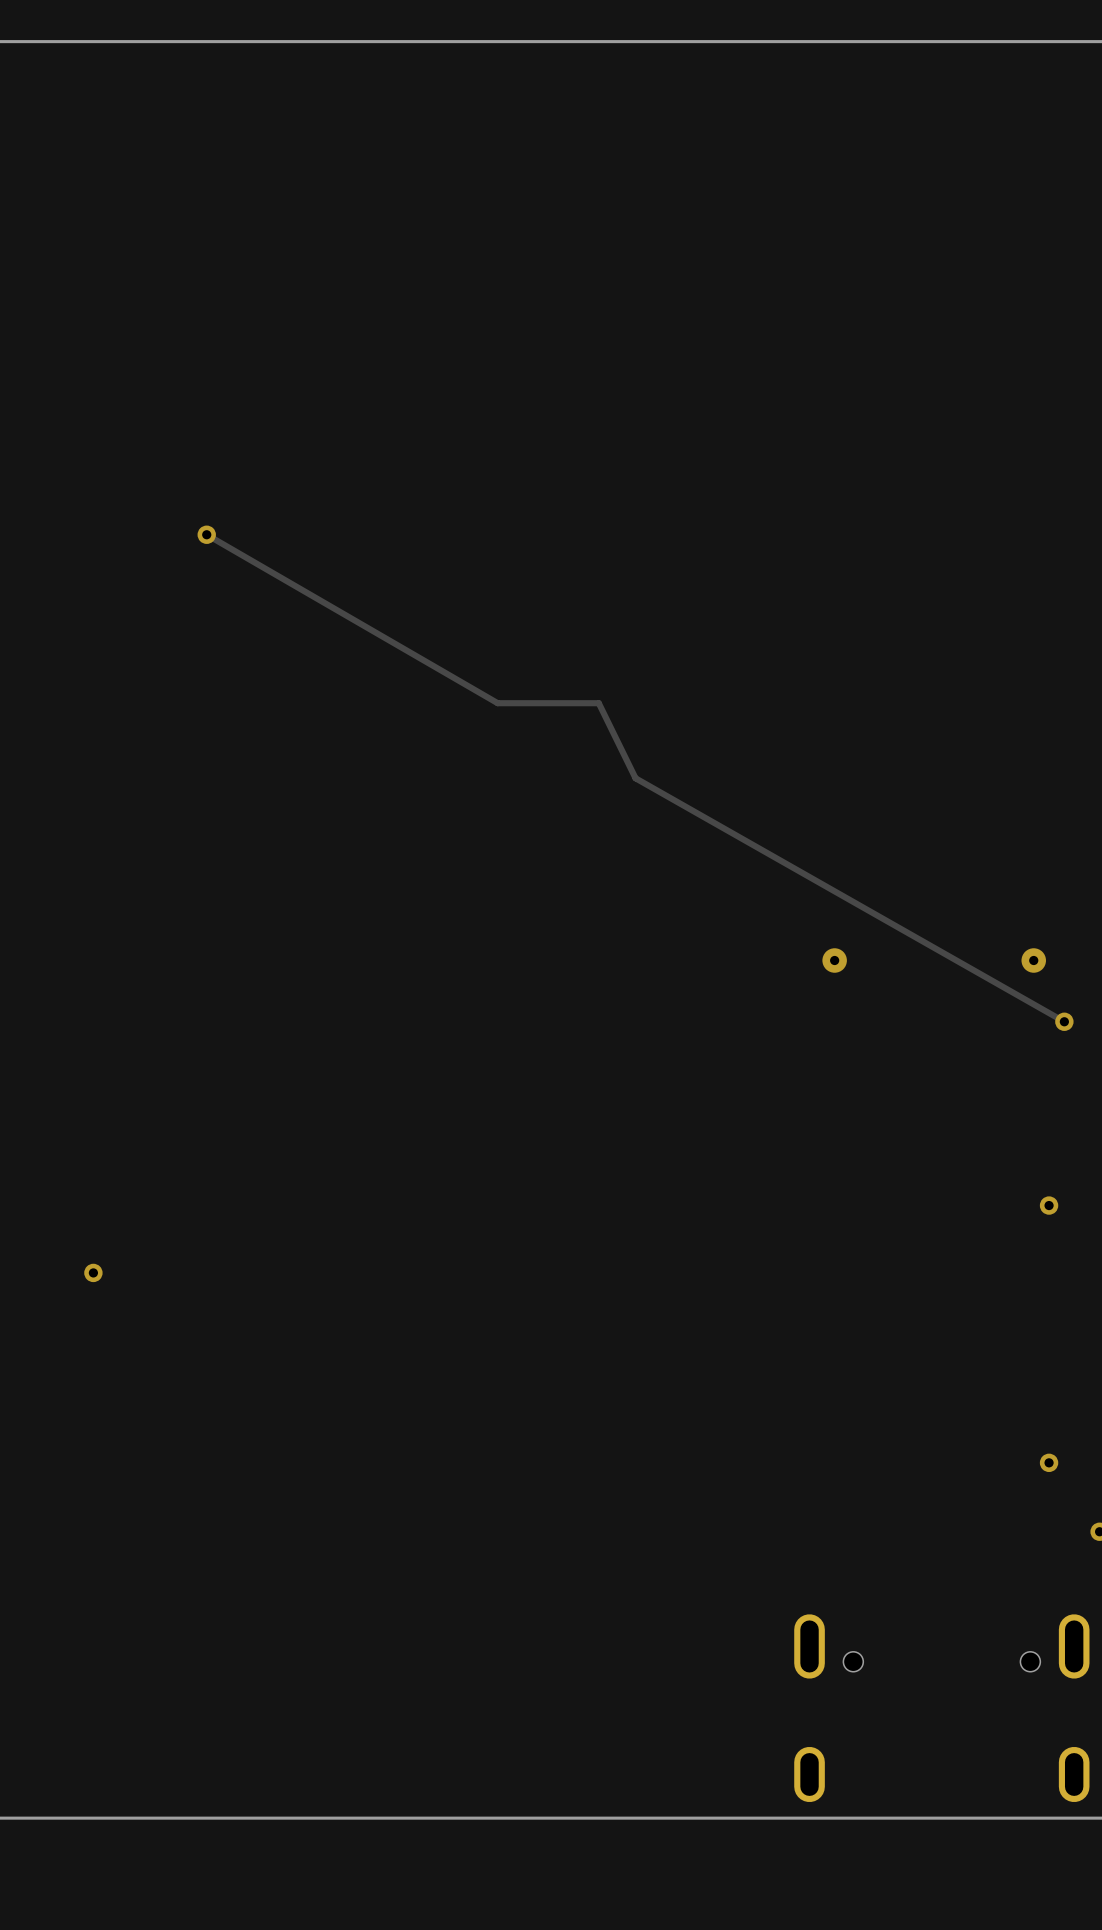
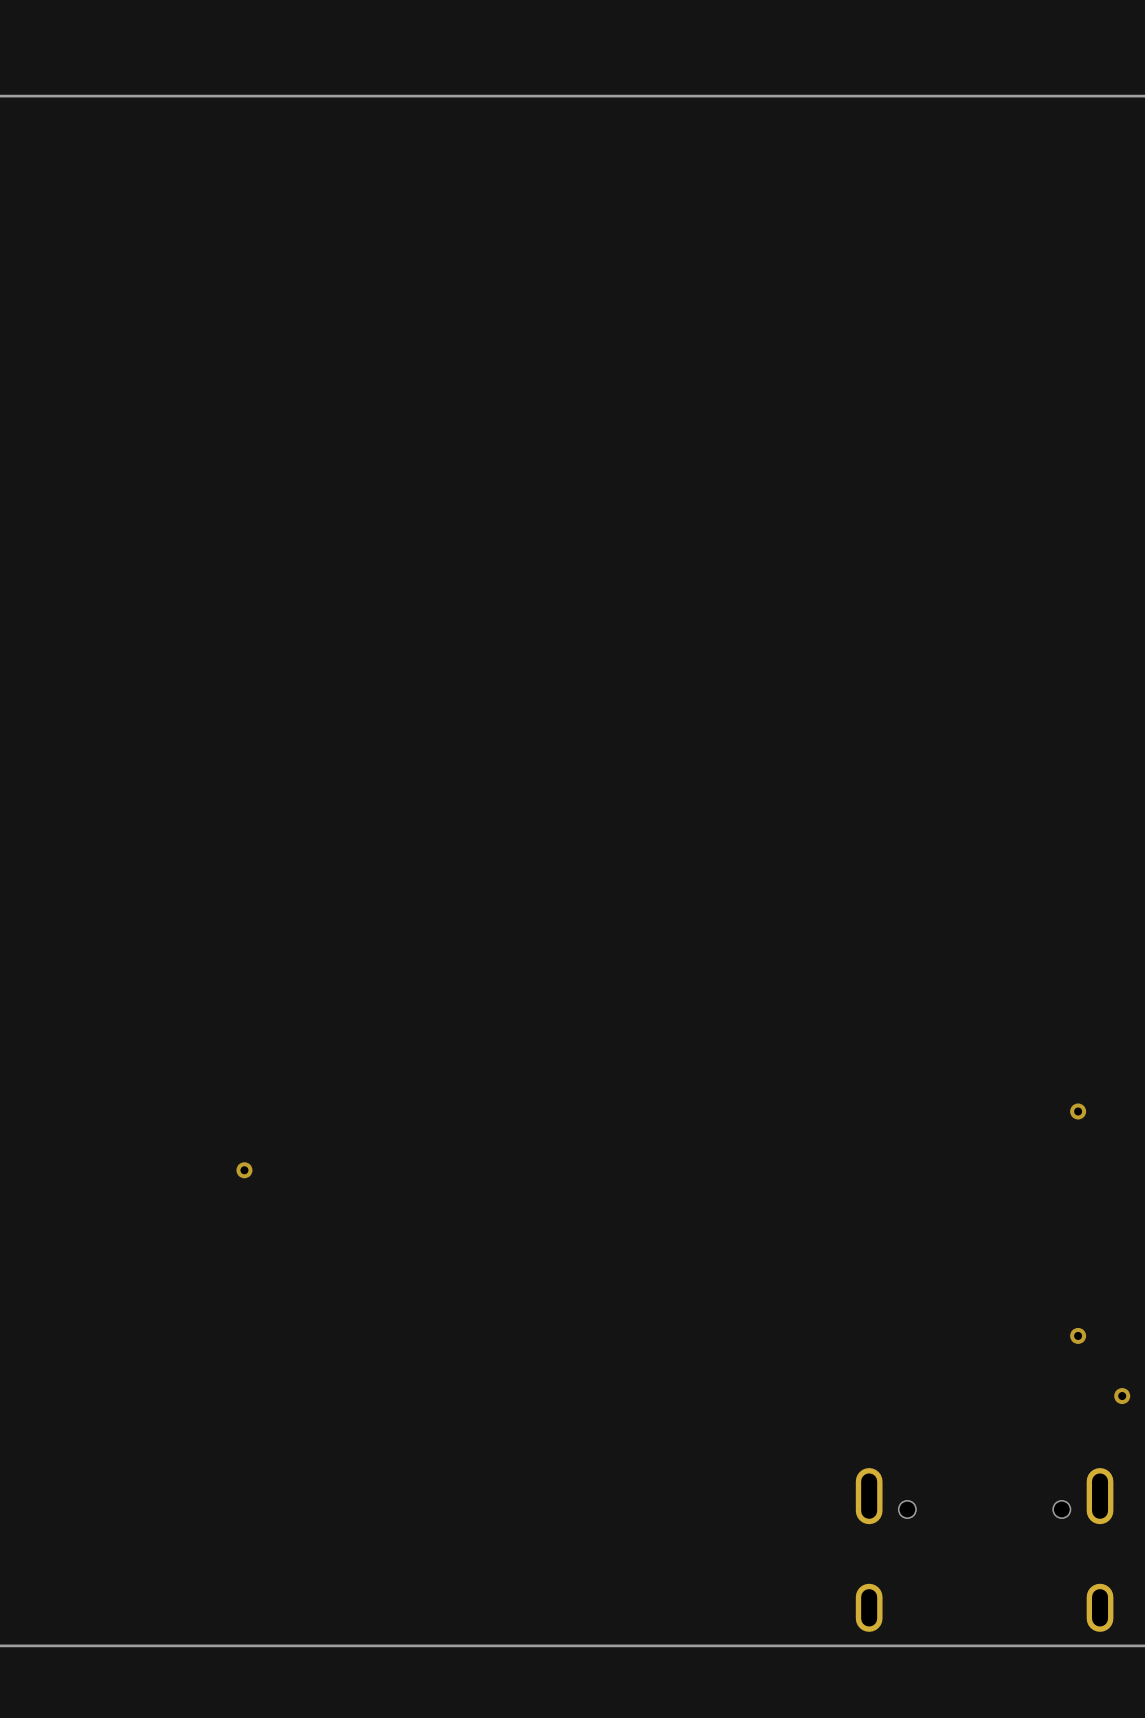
track: (206, 534) (497, 703) (598, 703) (635, 778) (1064, 1021) -> none
via: (206, 534) -> none
via: (834, 960) -> none
via: (1033, 960) -> none
via: (1064, 1021) -> none

